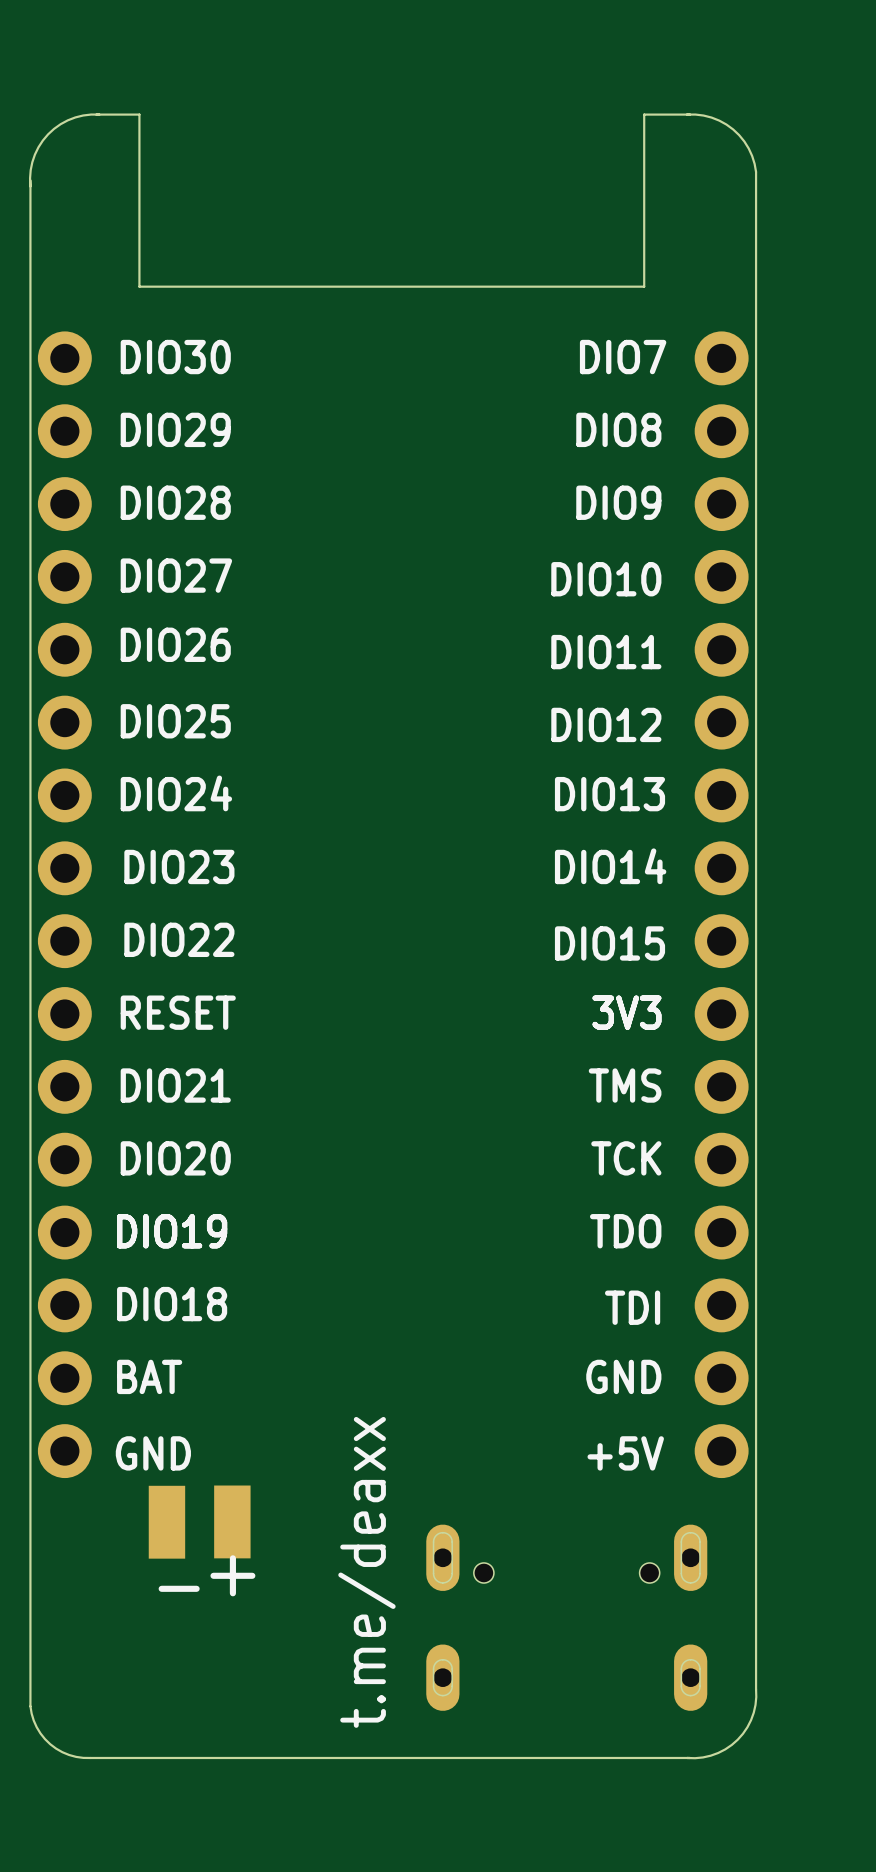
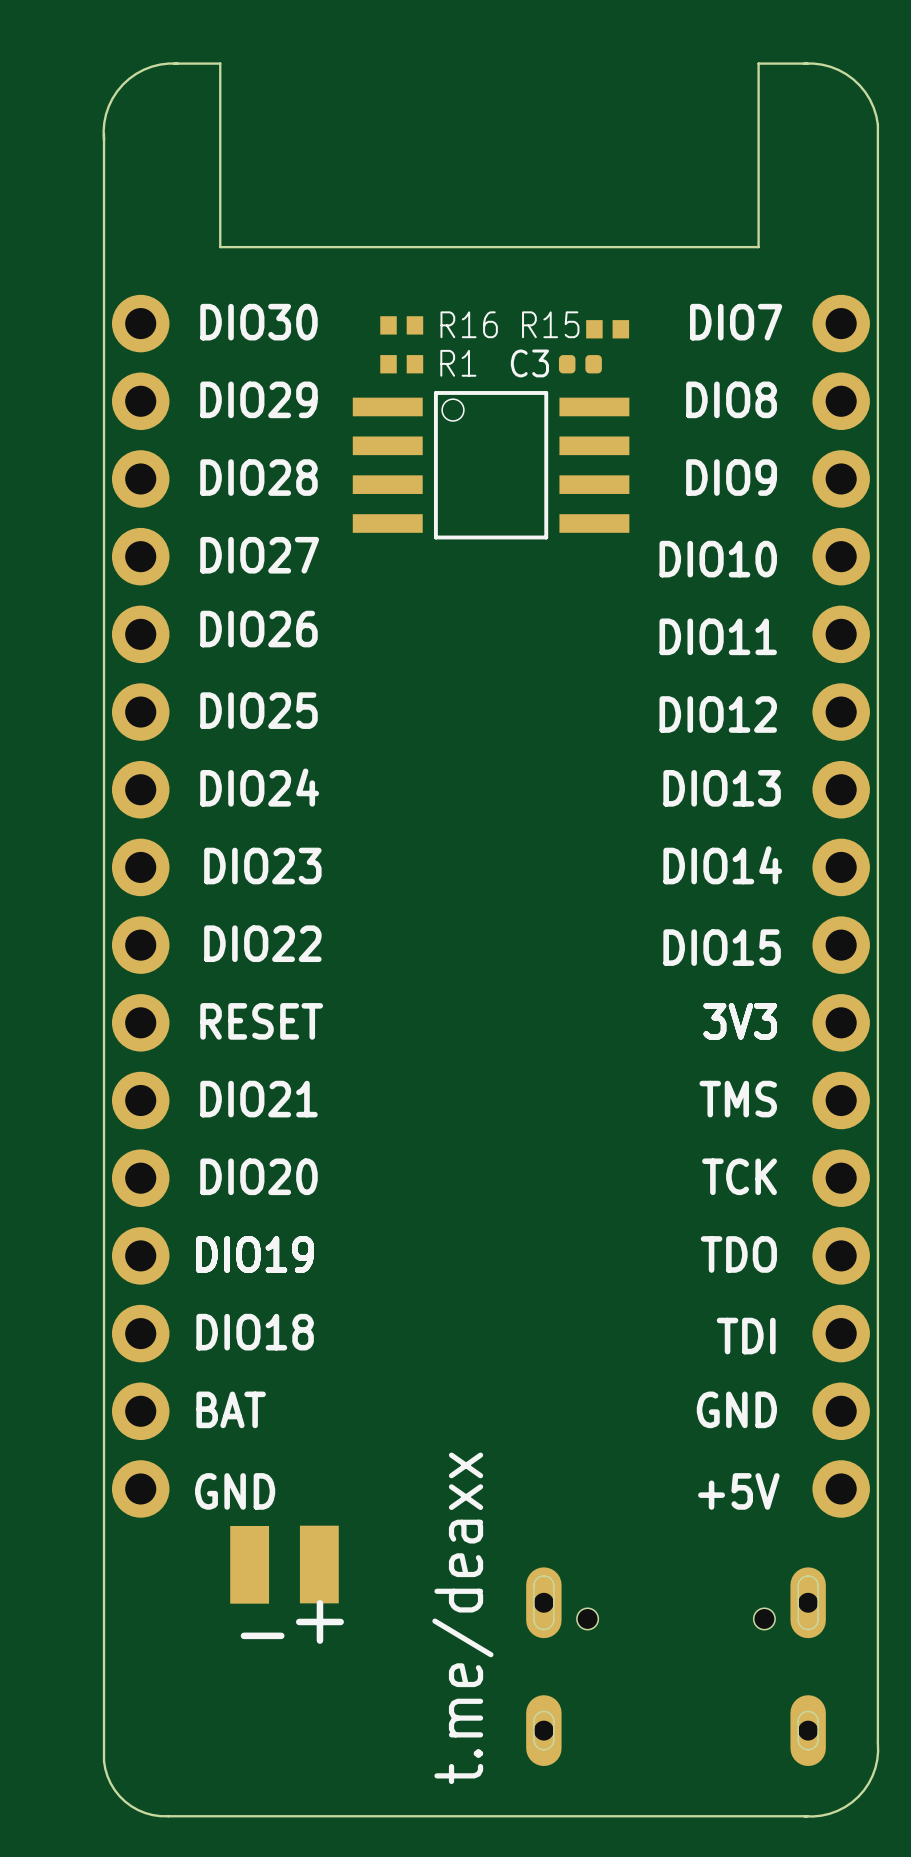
R16: none -> (401, 325)
R15: none -> (607, 329)
R1: none -> (401, 364)
C3: none -> (580, 364)
part: none -> (491, 465)

